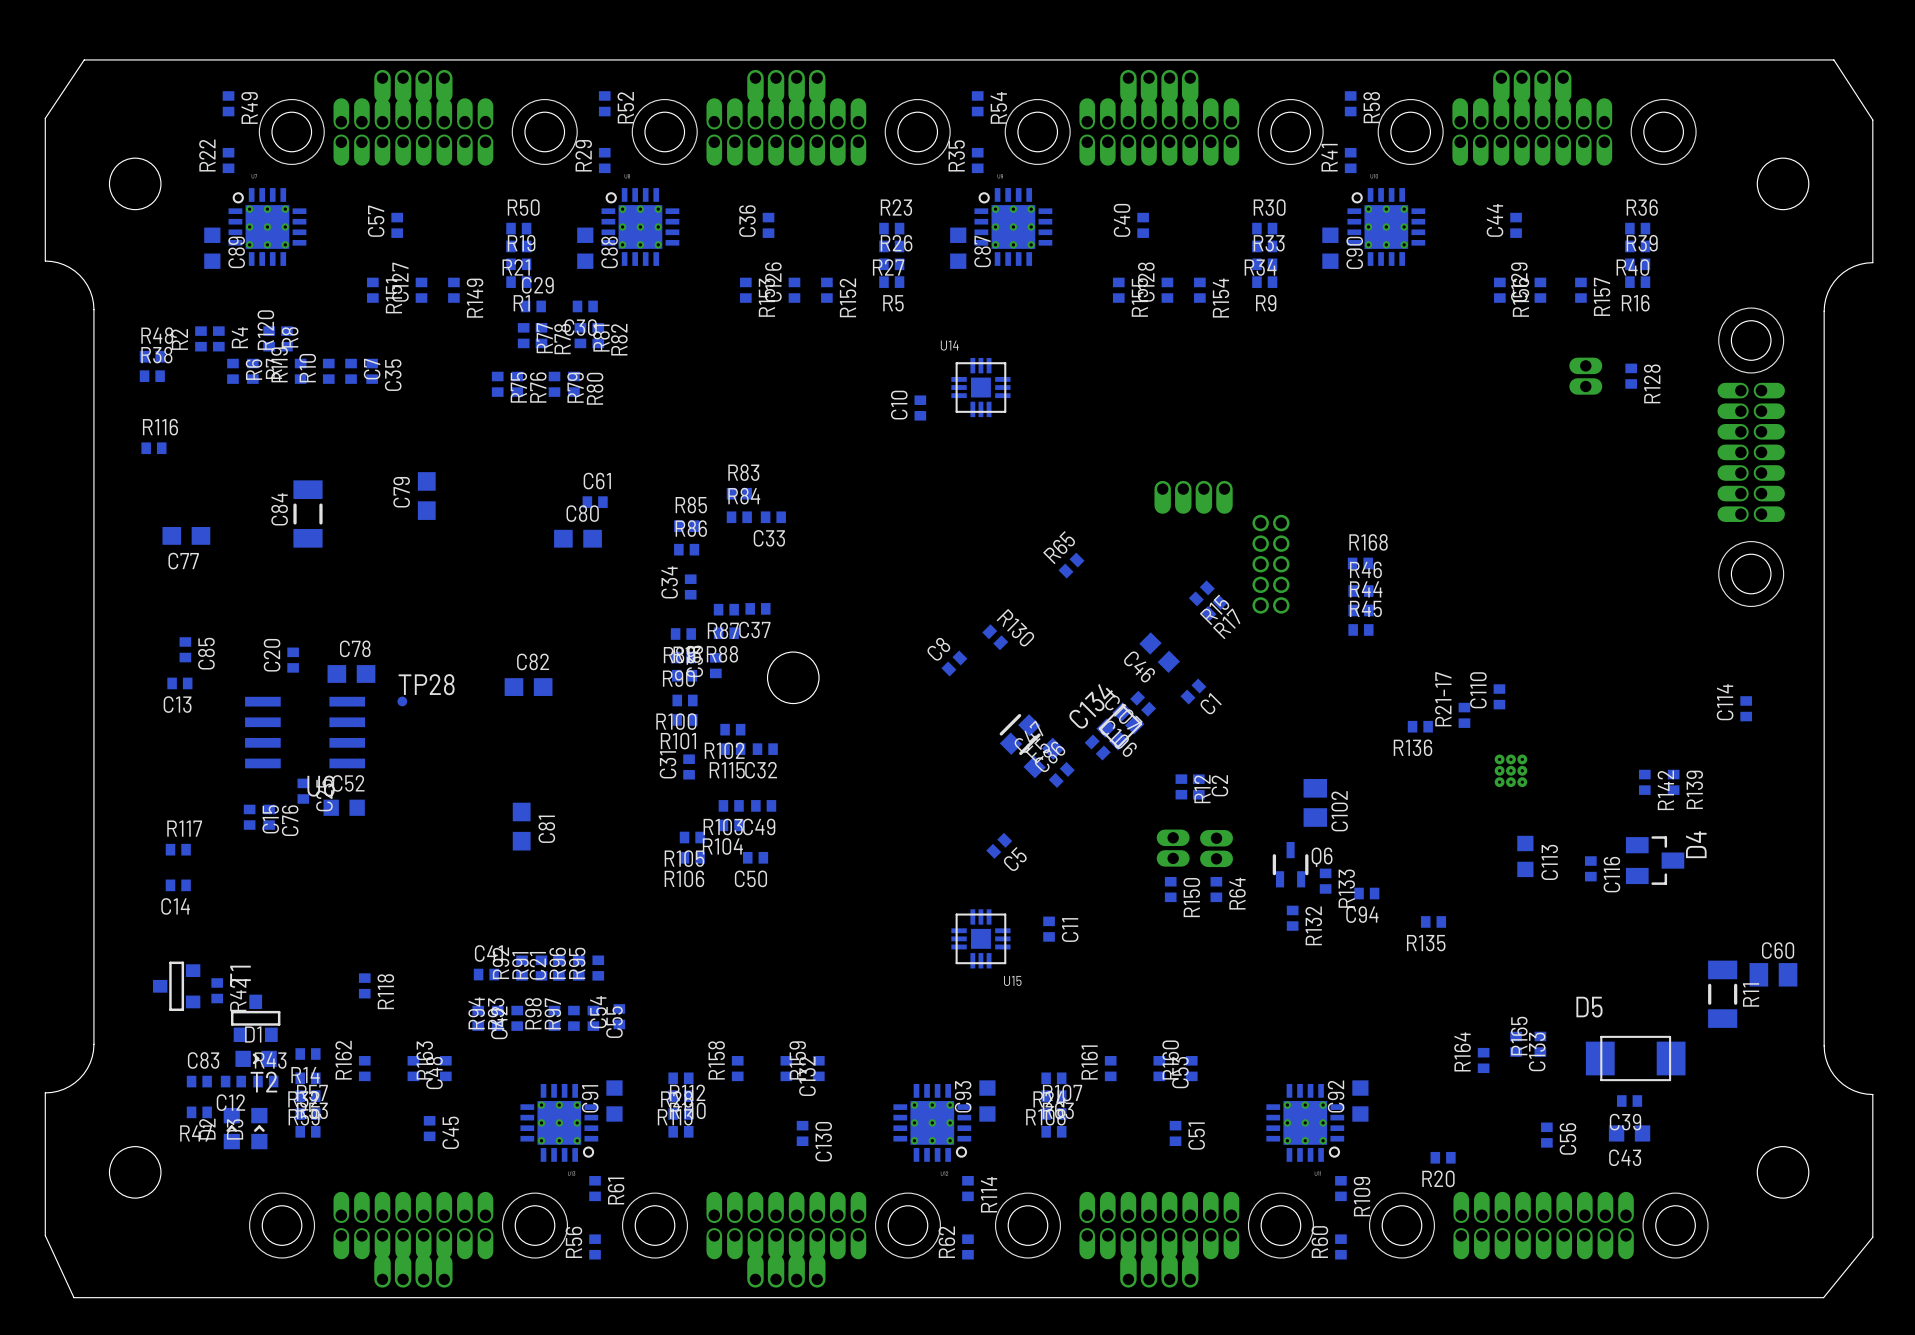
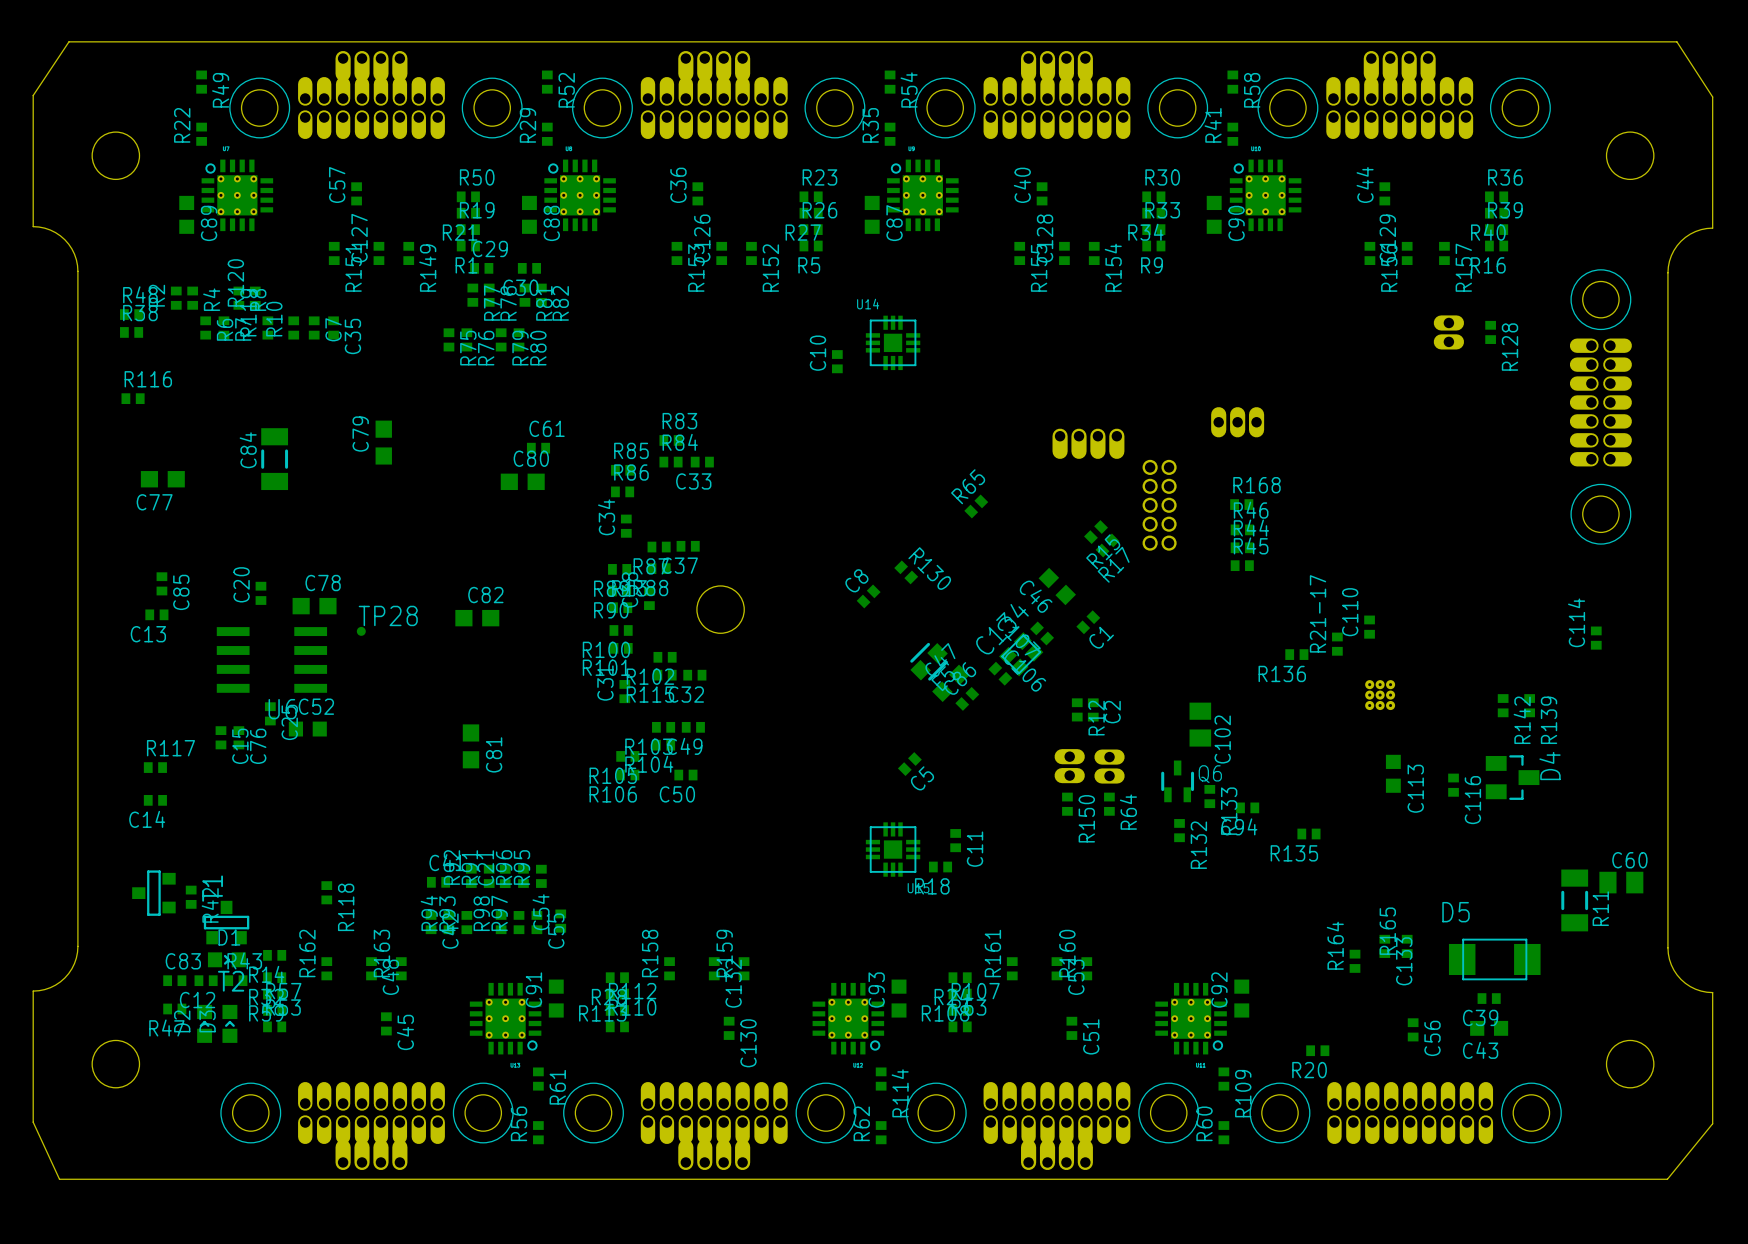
part: none -> (1237, 422)
R18: none -> (940, 867)

